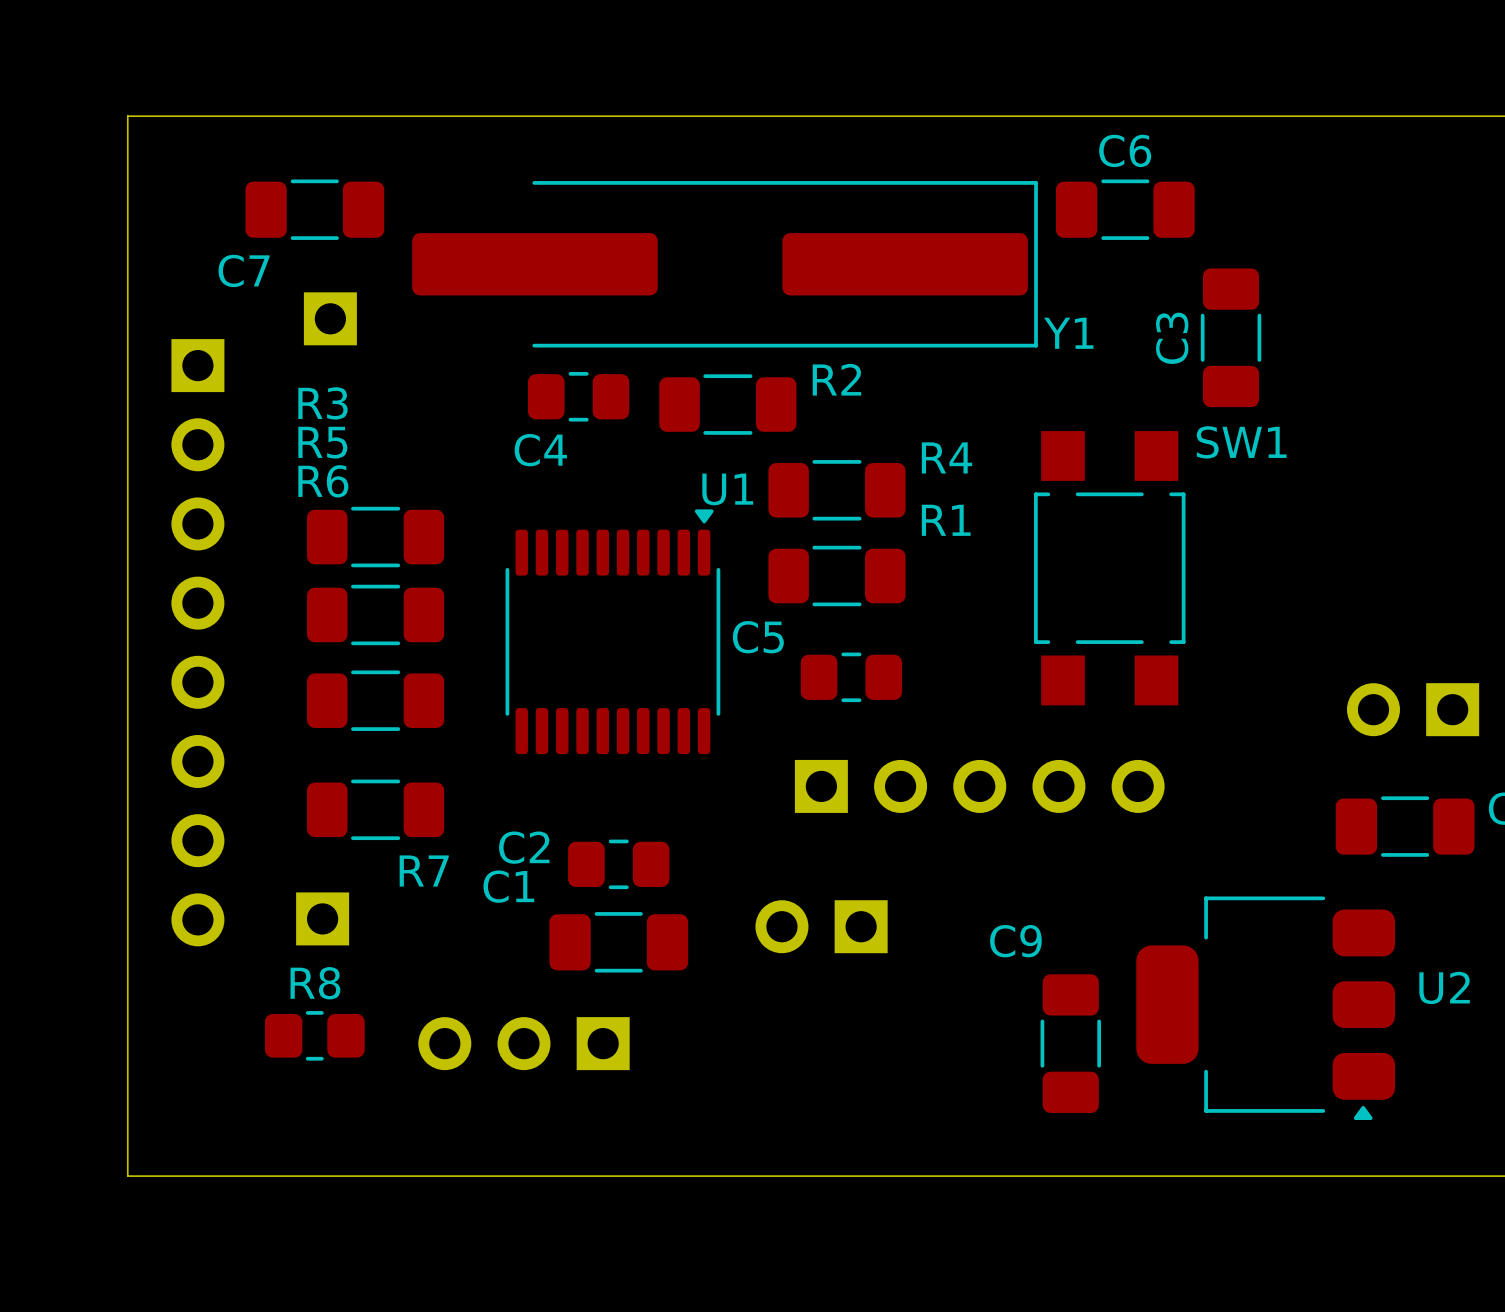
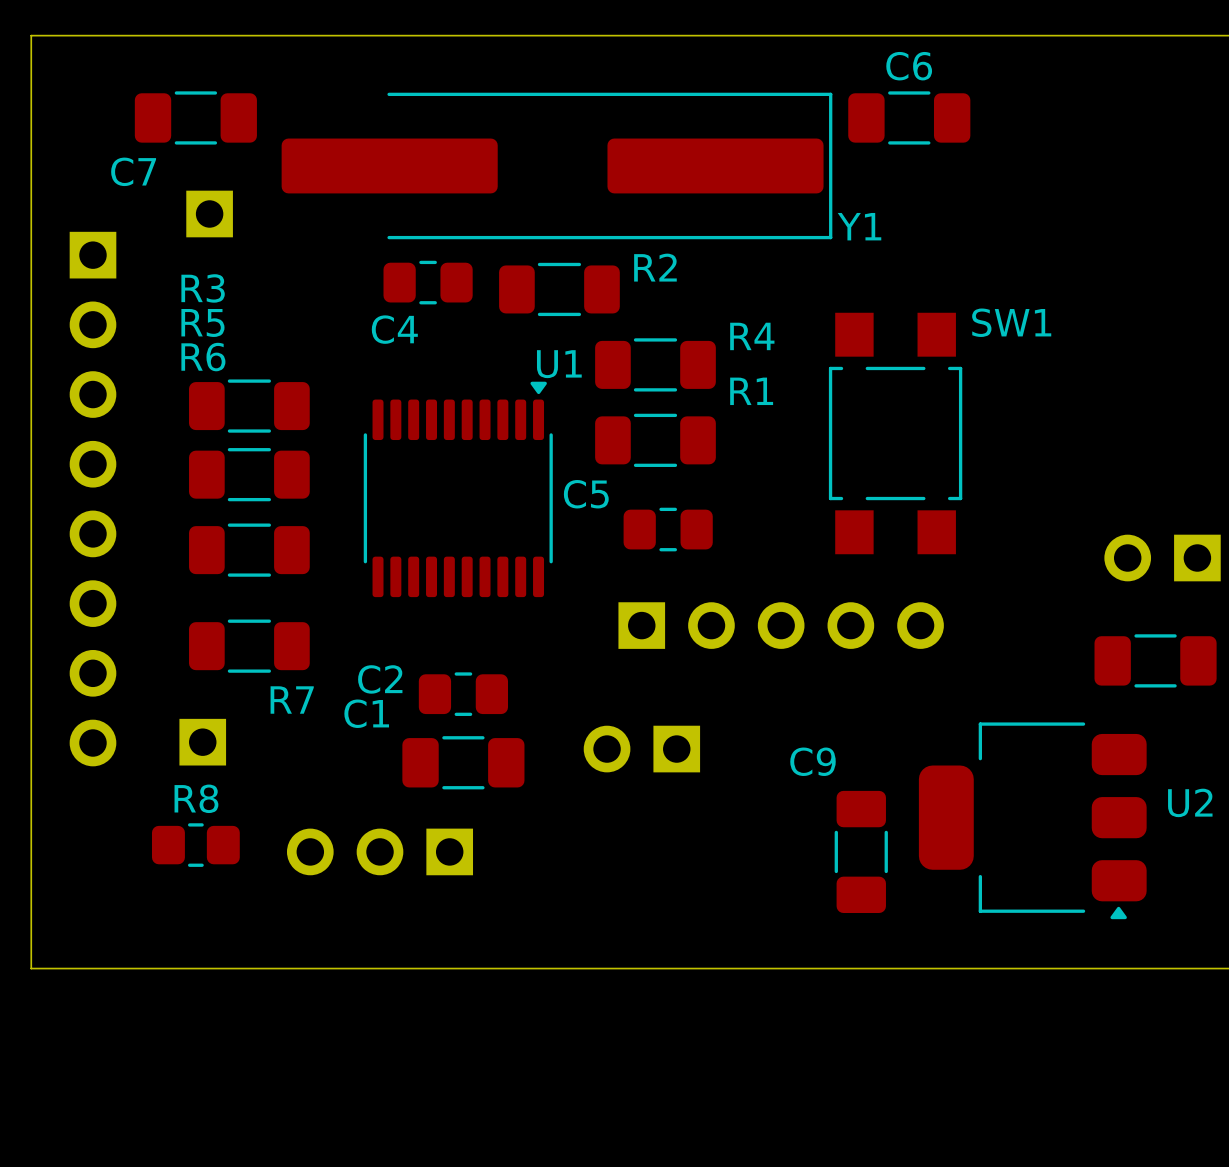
C3: (1231, 337) -> none

